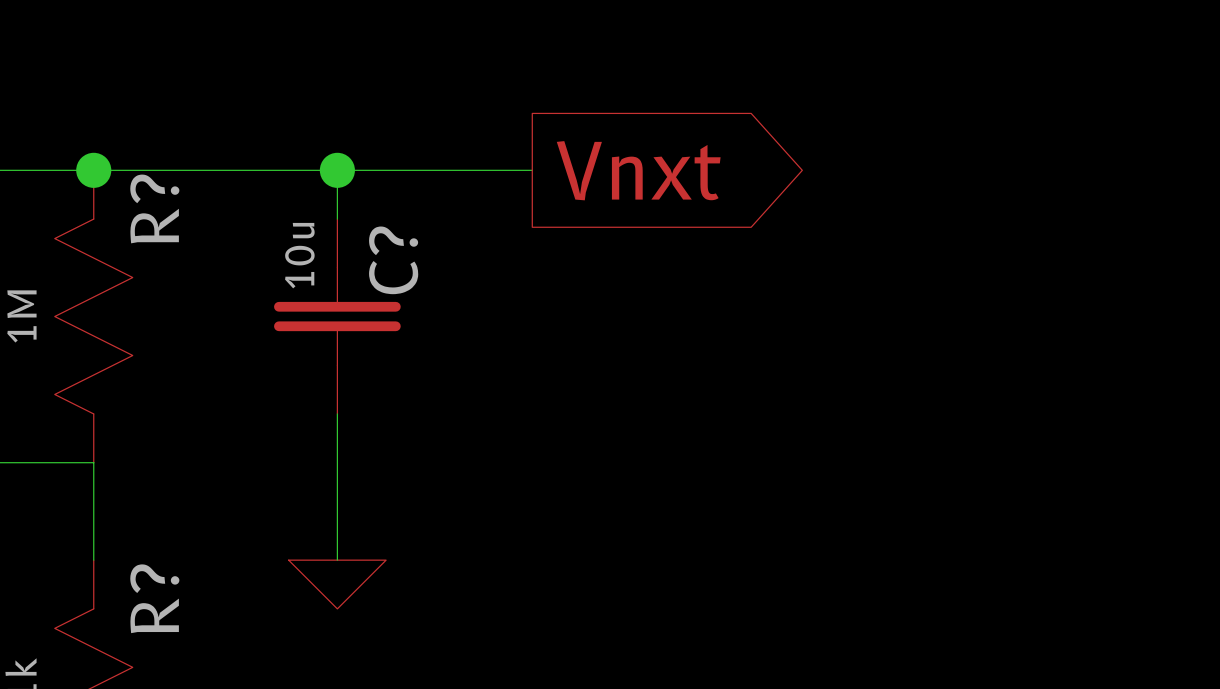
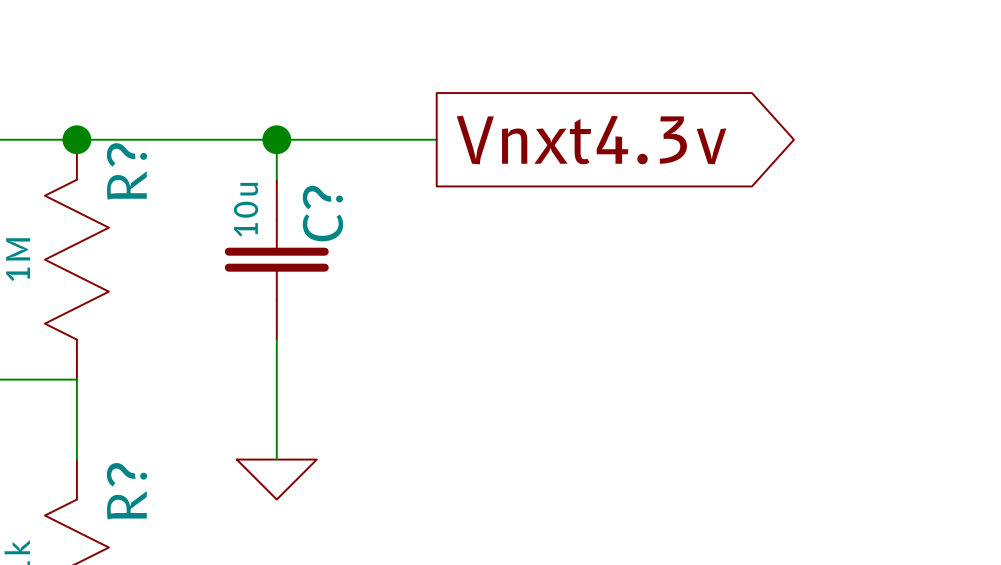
global label: Vnxt (638, 170) -> Vnxt4.3v (591, 140)

